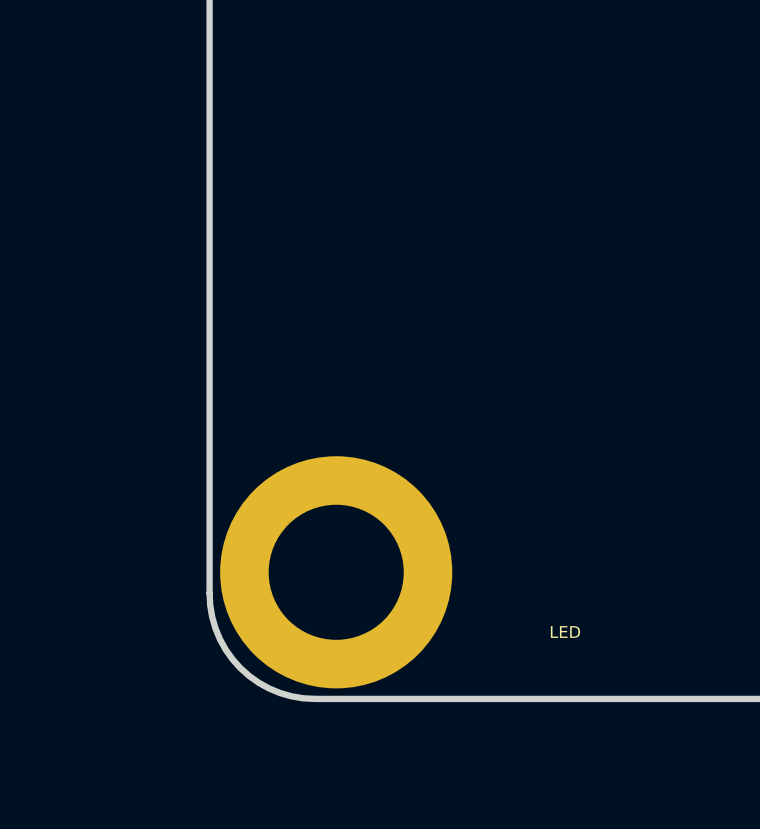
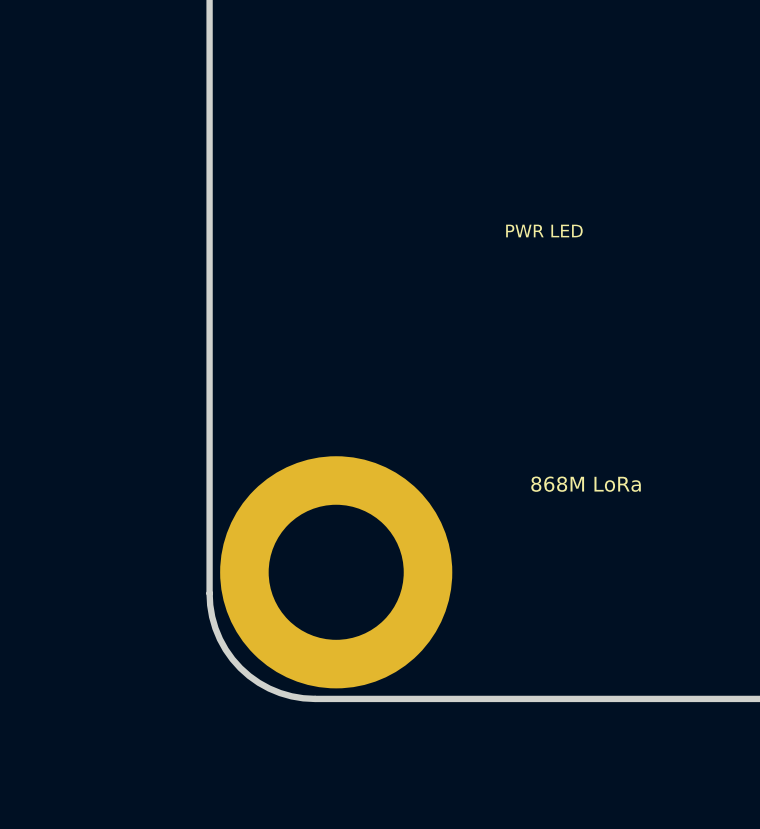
text: none -> PWR LED (544, 231)
text: none -> 868M LoRa (586, 484)
text: LED (565, 632) -> none

